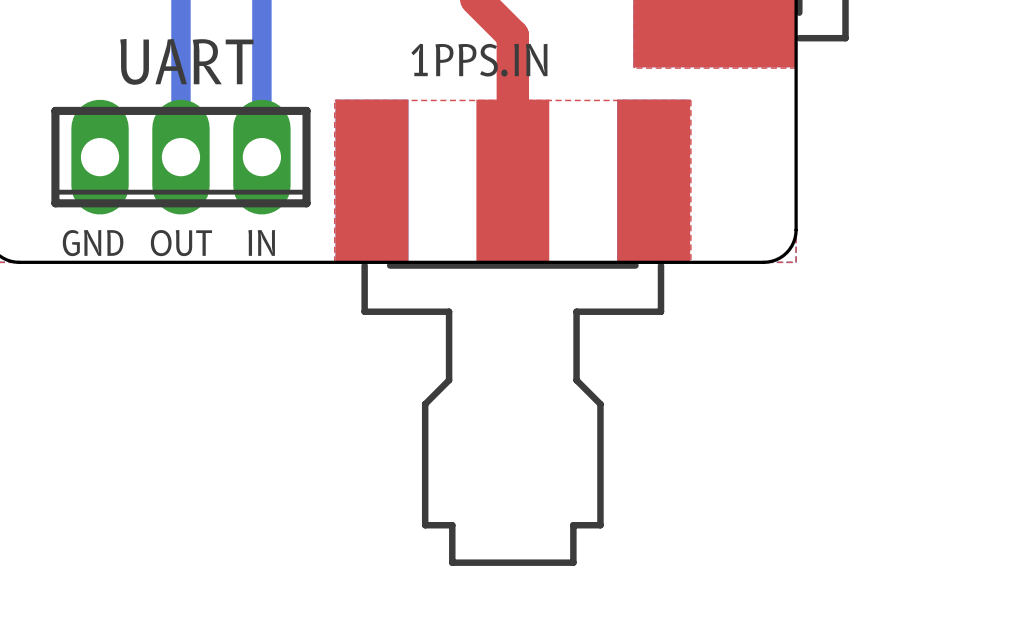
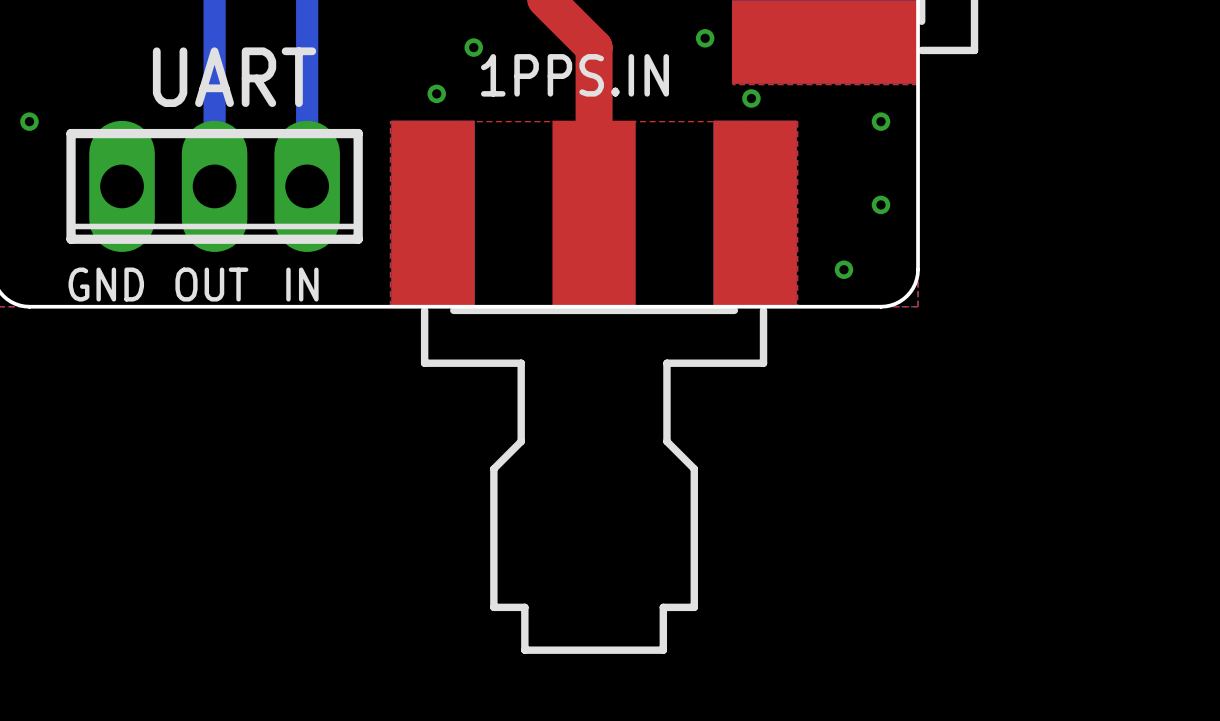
via: none -> (705, 38)
via: none -> (473, 47)
via: none -> (436, 93)
via: none -> (751, 98)
via: none -> (29, 121)
via: none -> (881, 121)
via: none -> (881, 204)
via: none -> (843, 269)

